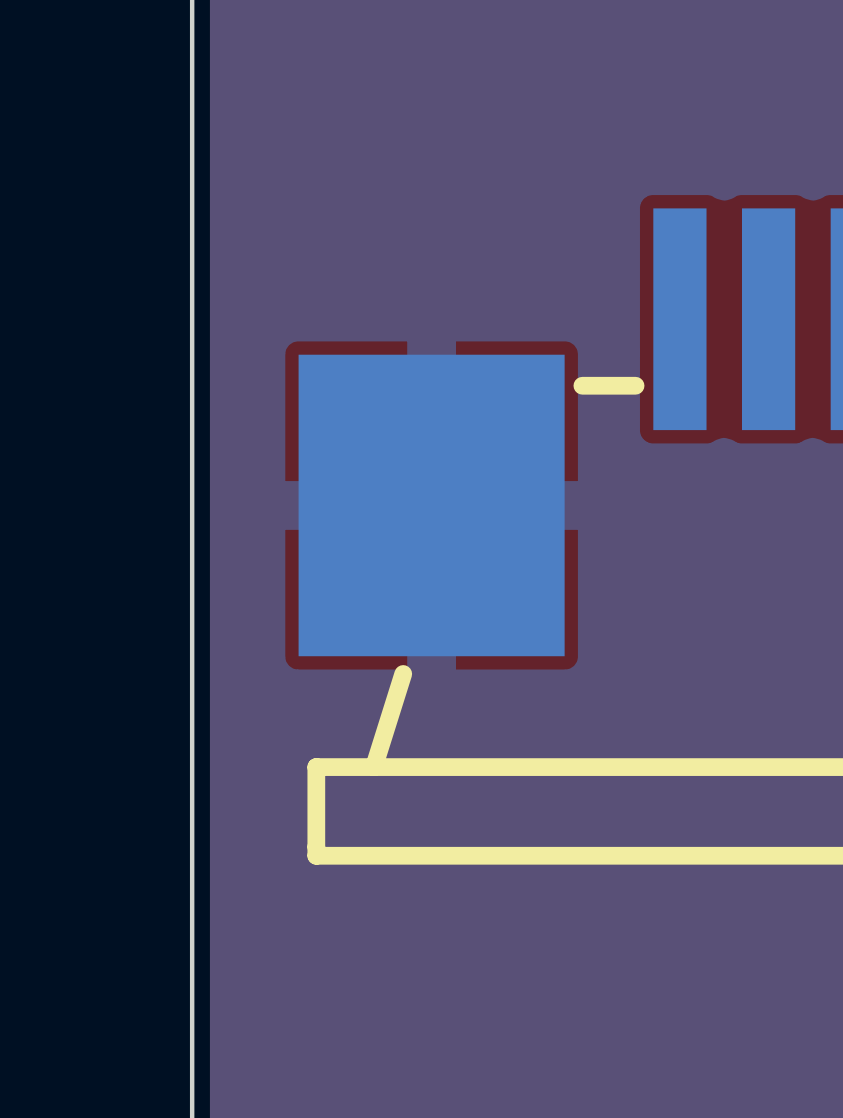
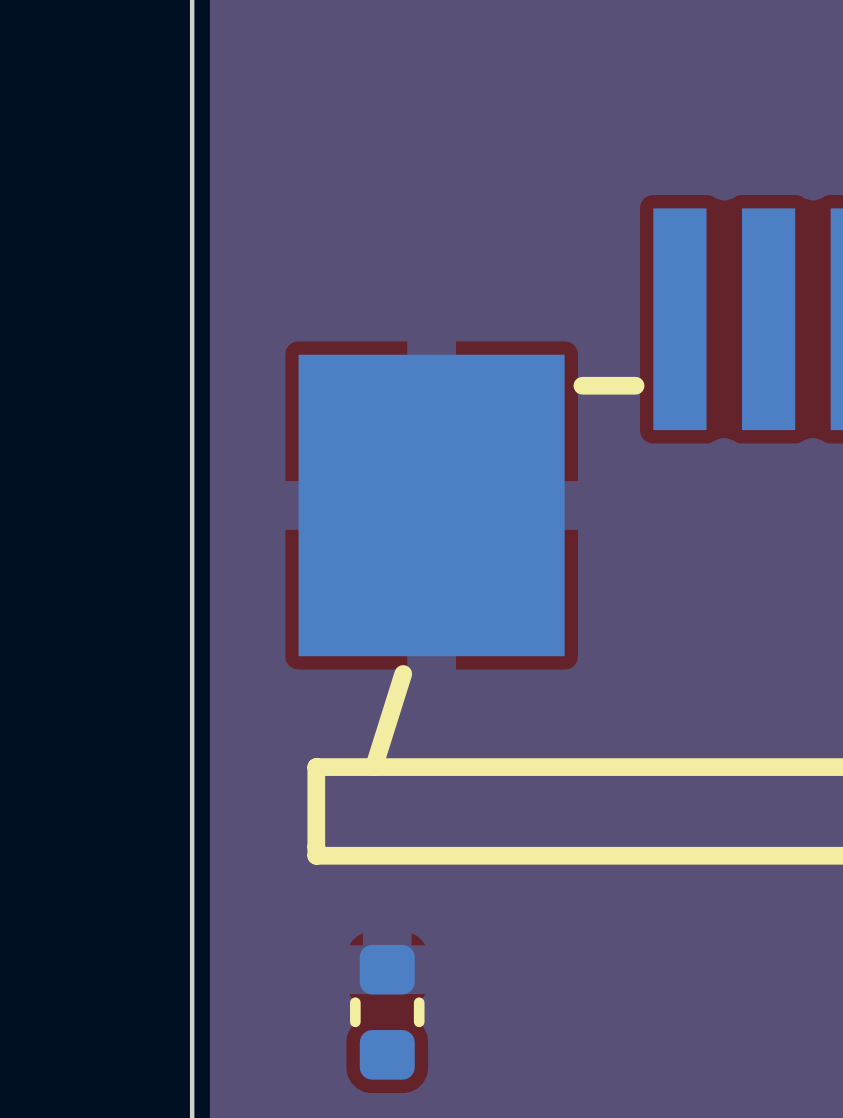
part: none -> (387, 1012)

